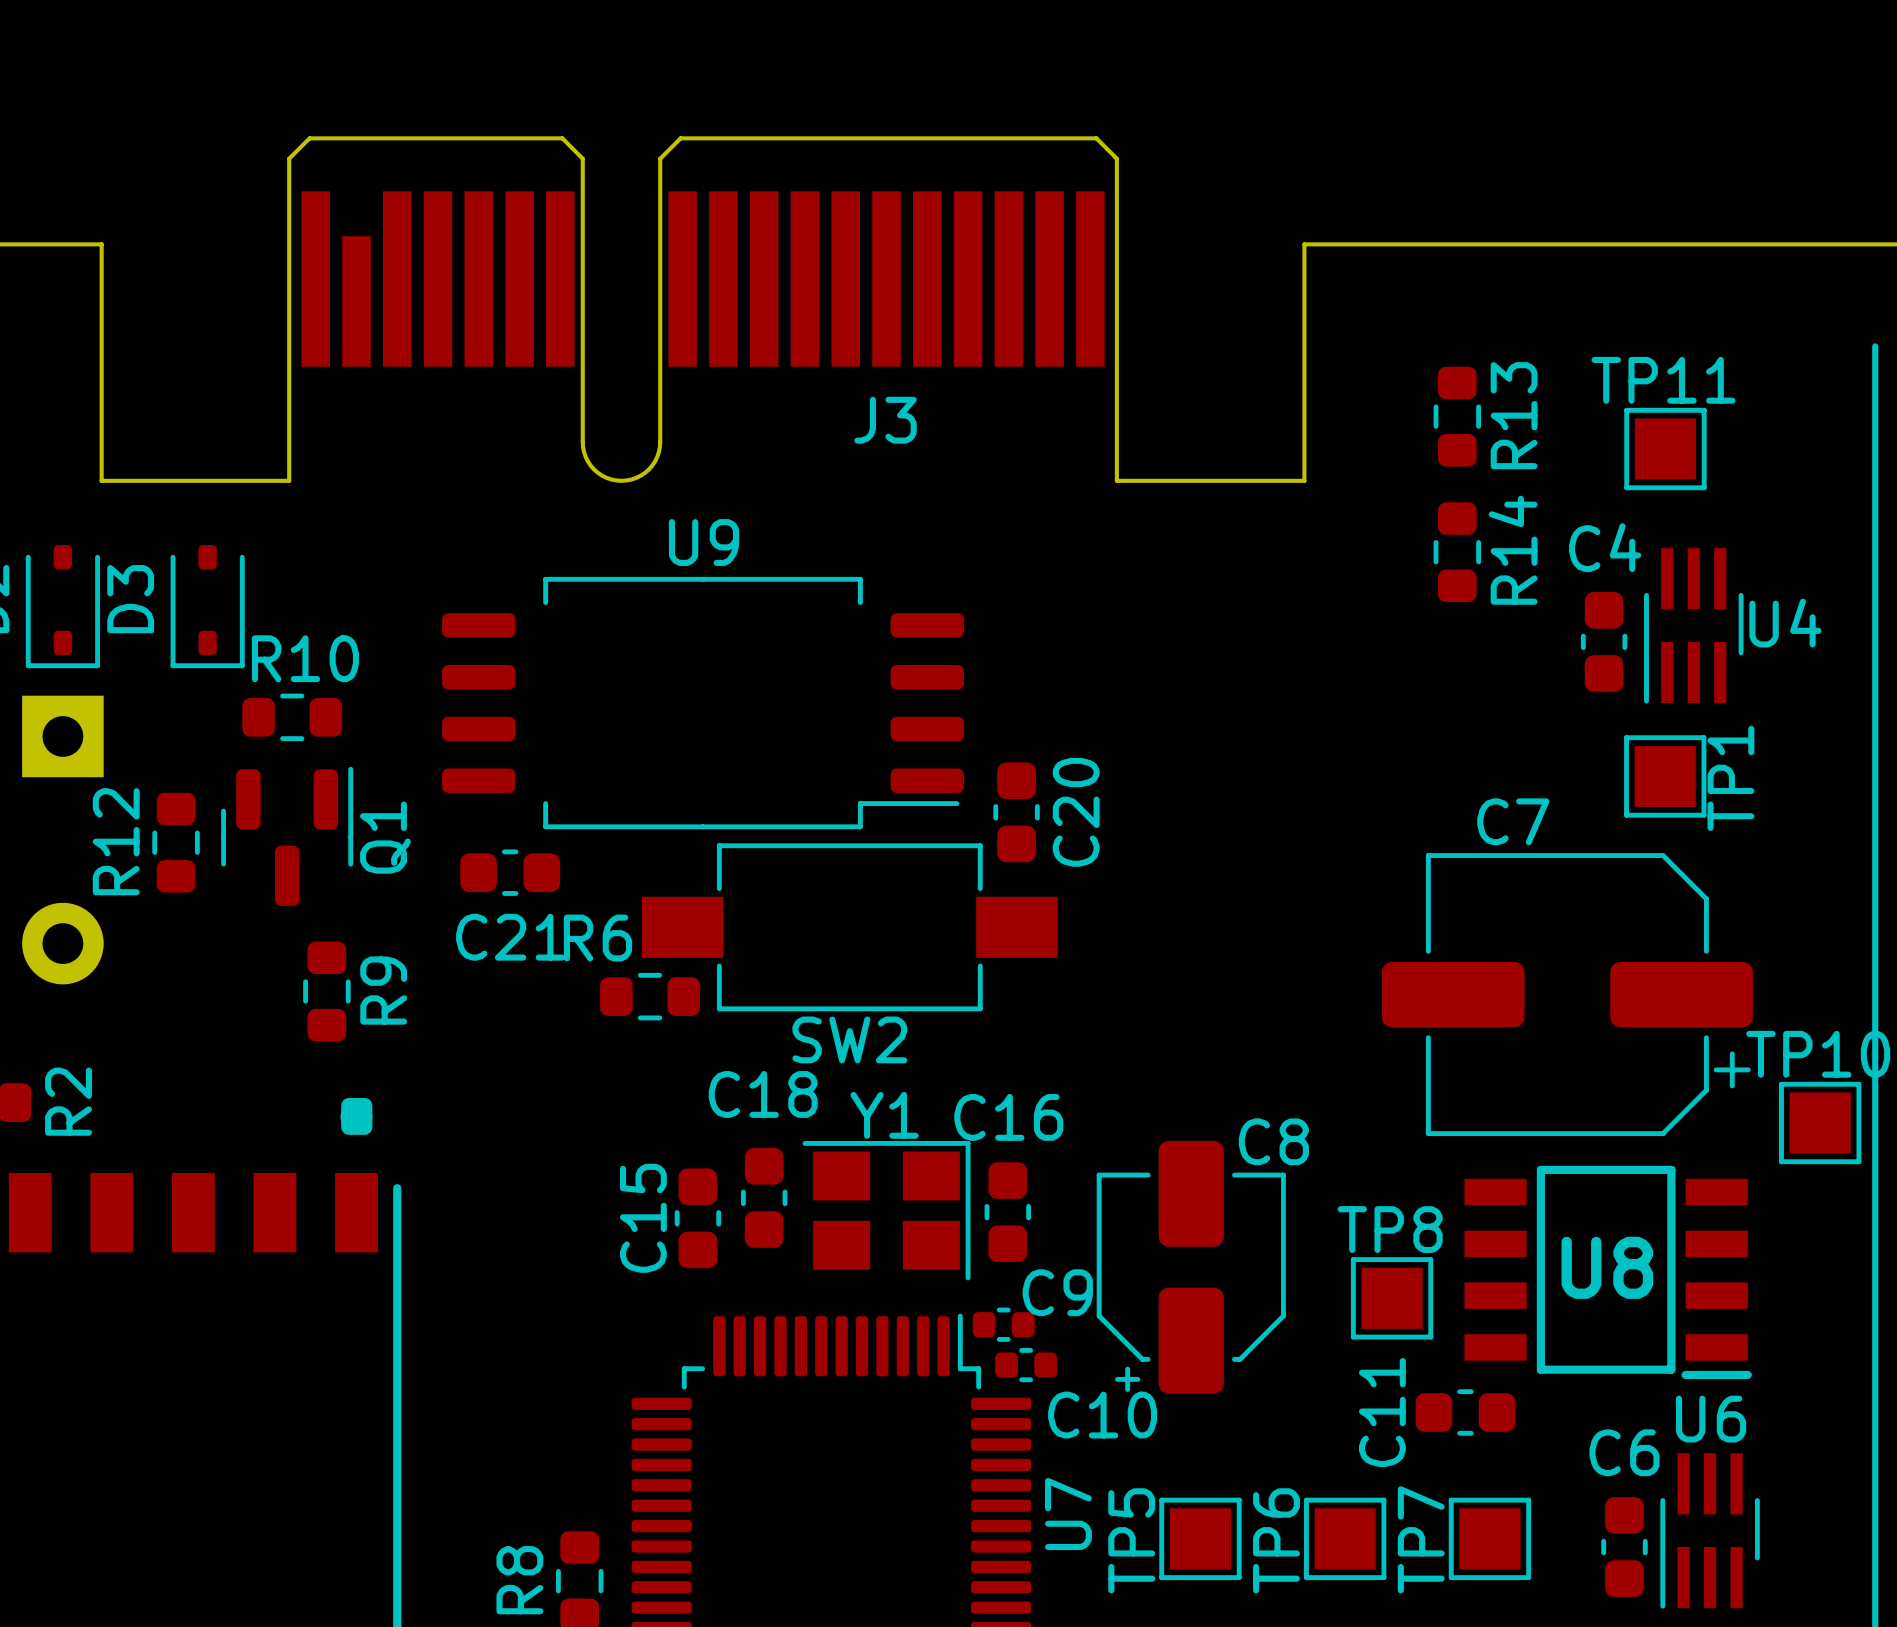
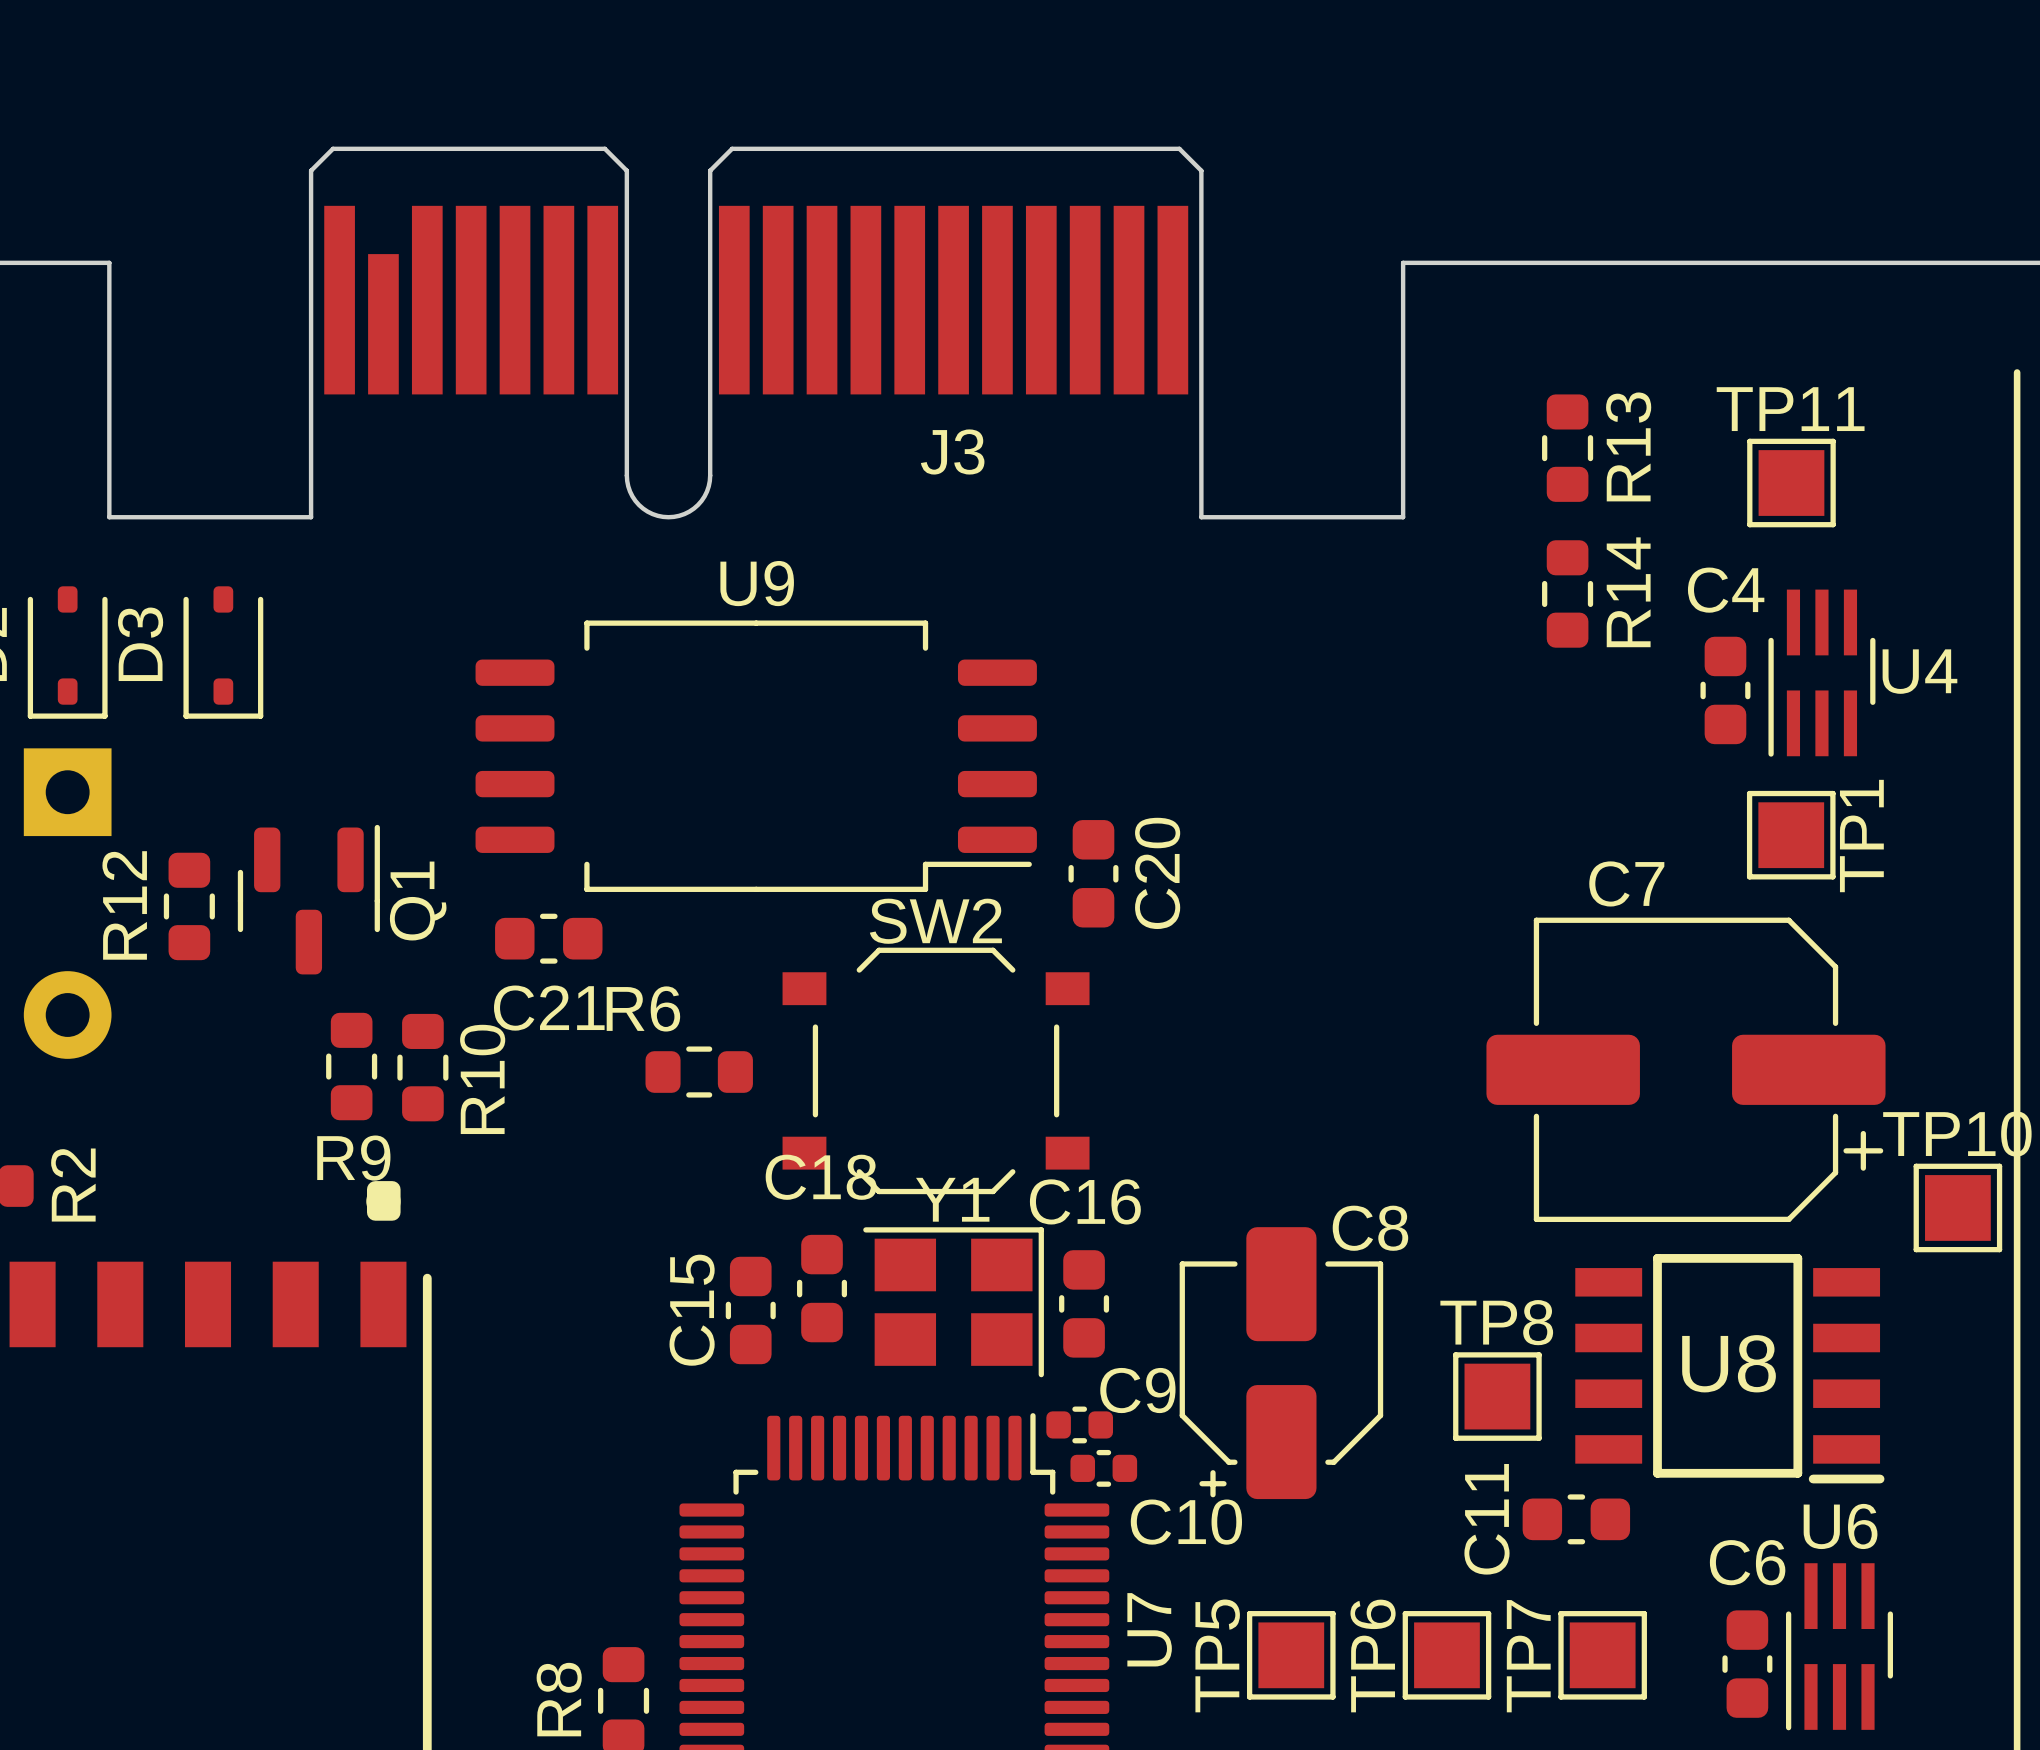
R10 rotation: 0° (292, 717) -> 90° clockwise (422, 1067)
R10 position: (292, 717) -> (422, 1067)
SW2 footprint: [641, 843, 1058, 1012] -> [782, 947, 1090, 1195]
R9 name rotation: 0° (383, 990) -> 90° clockwise (353, 1158)
R9 name position: R9 (383, 990) -> R9 (353, 1158)
SW2 name position: SW2 (849, 1039) -> SW2 (935, 921)

